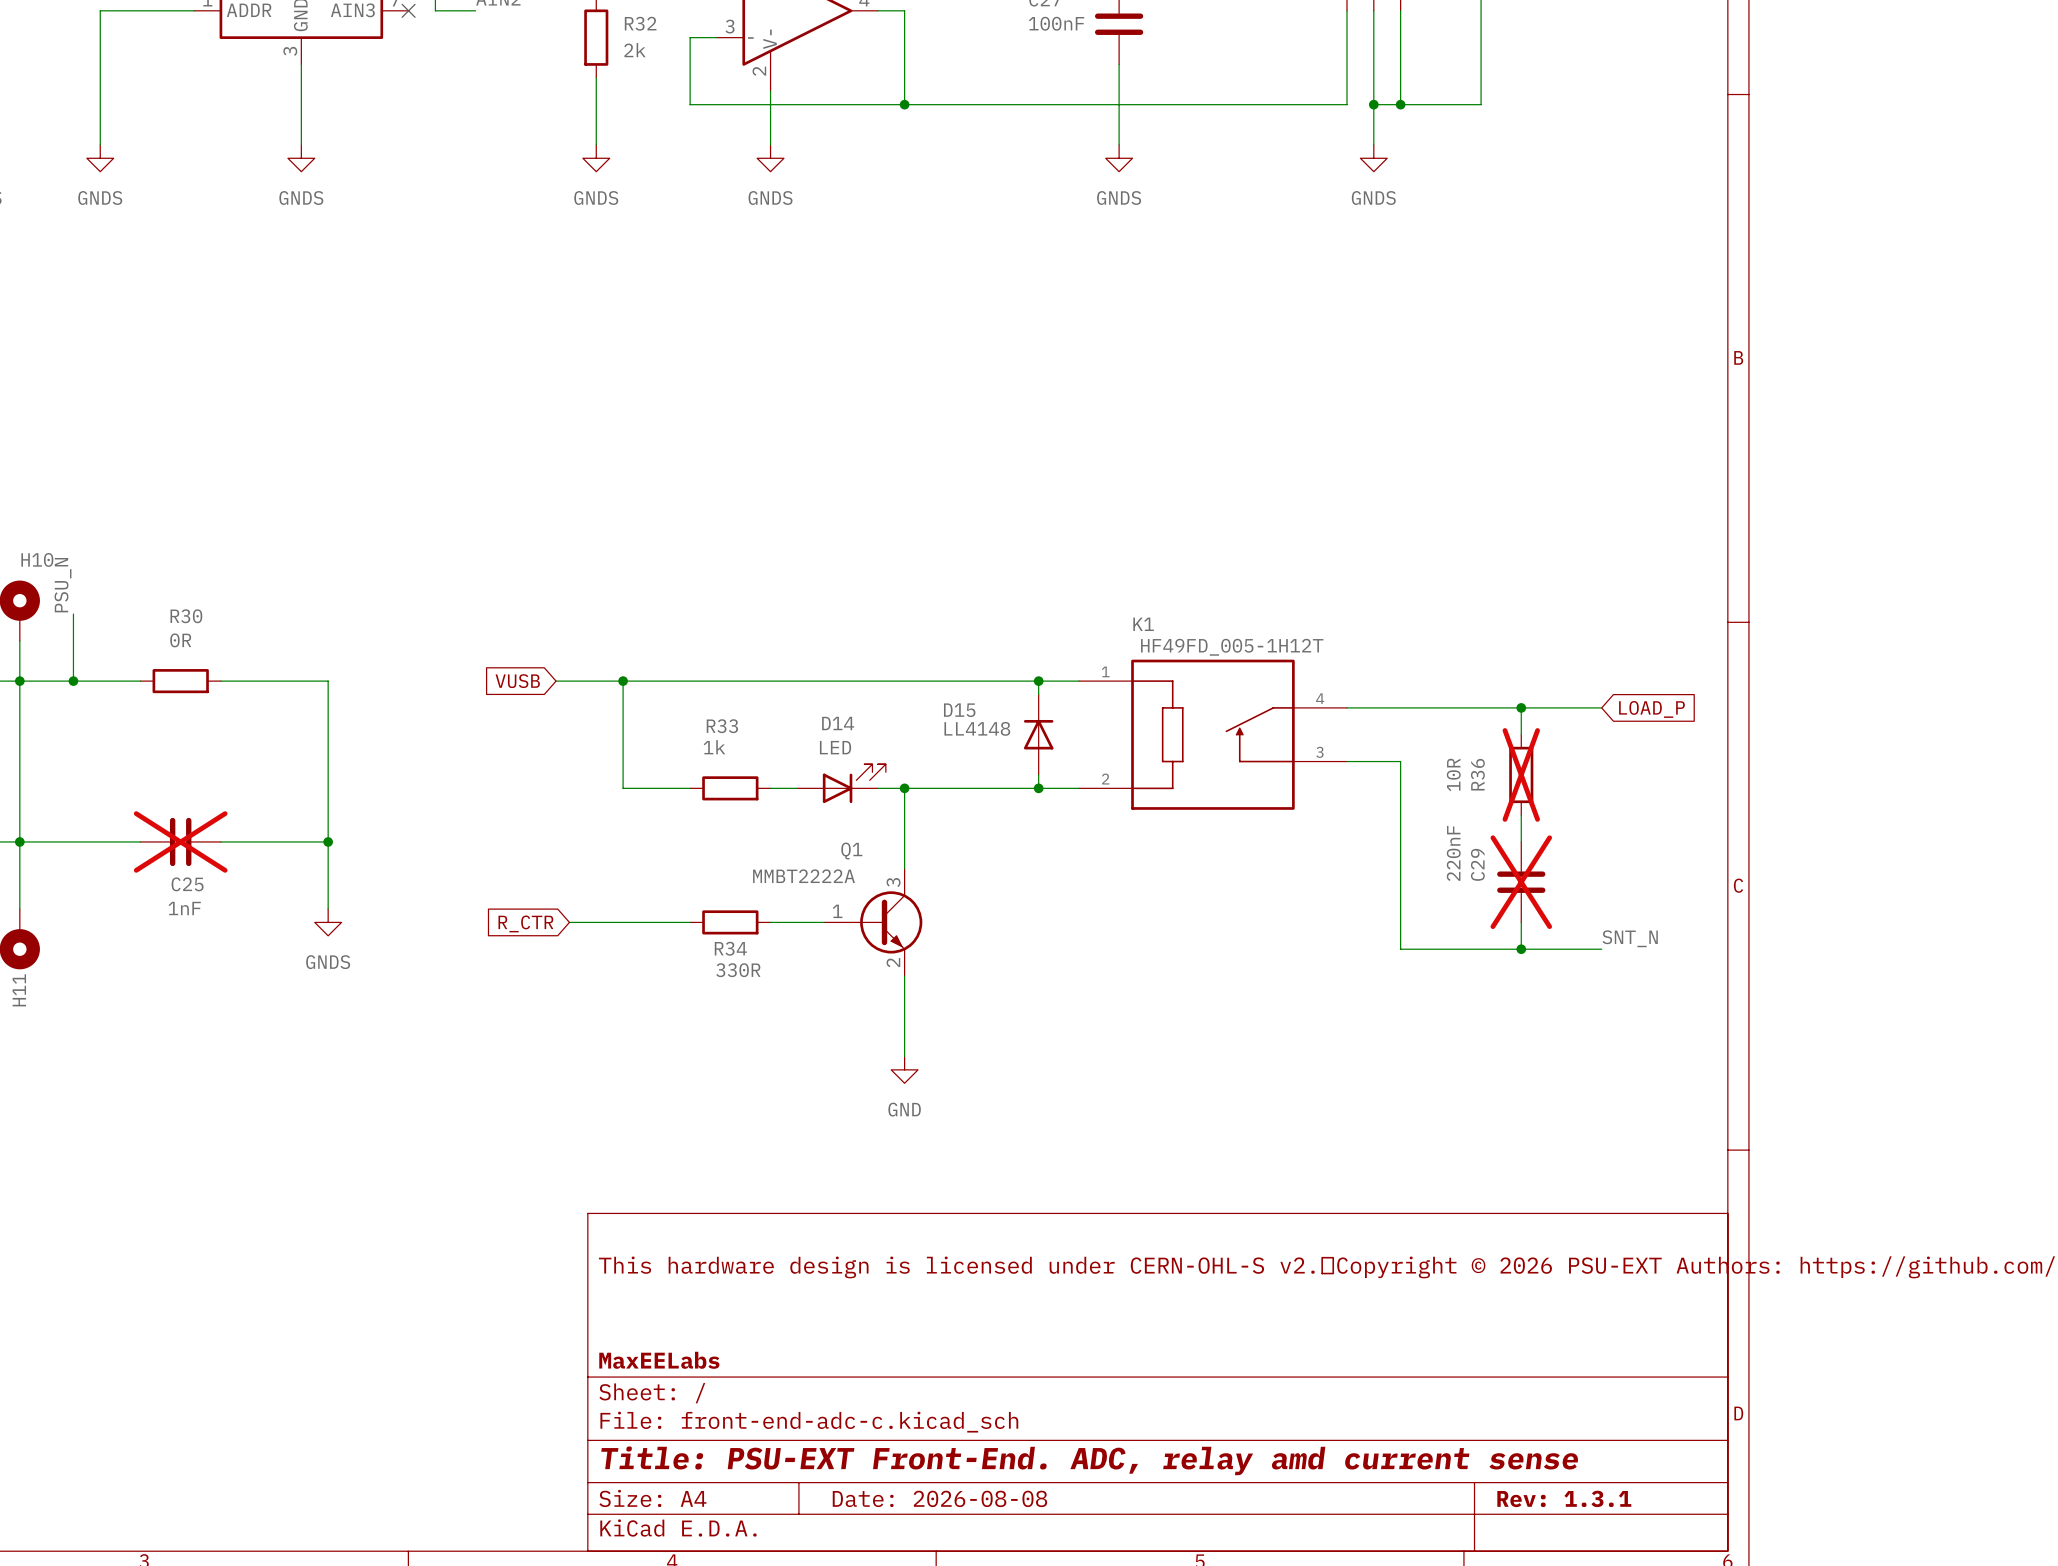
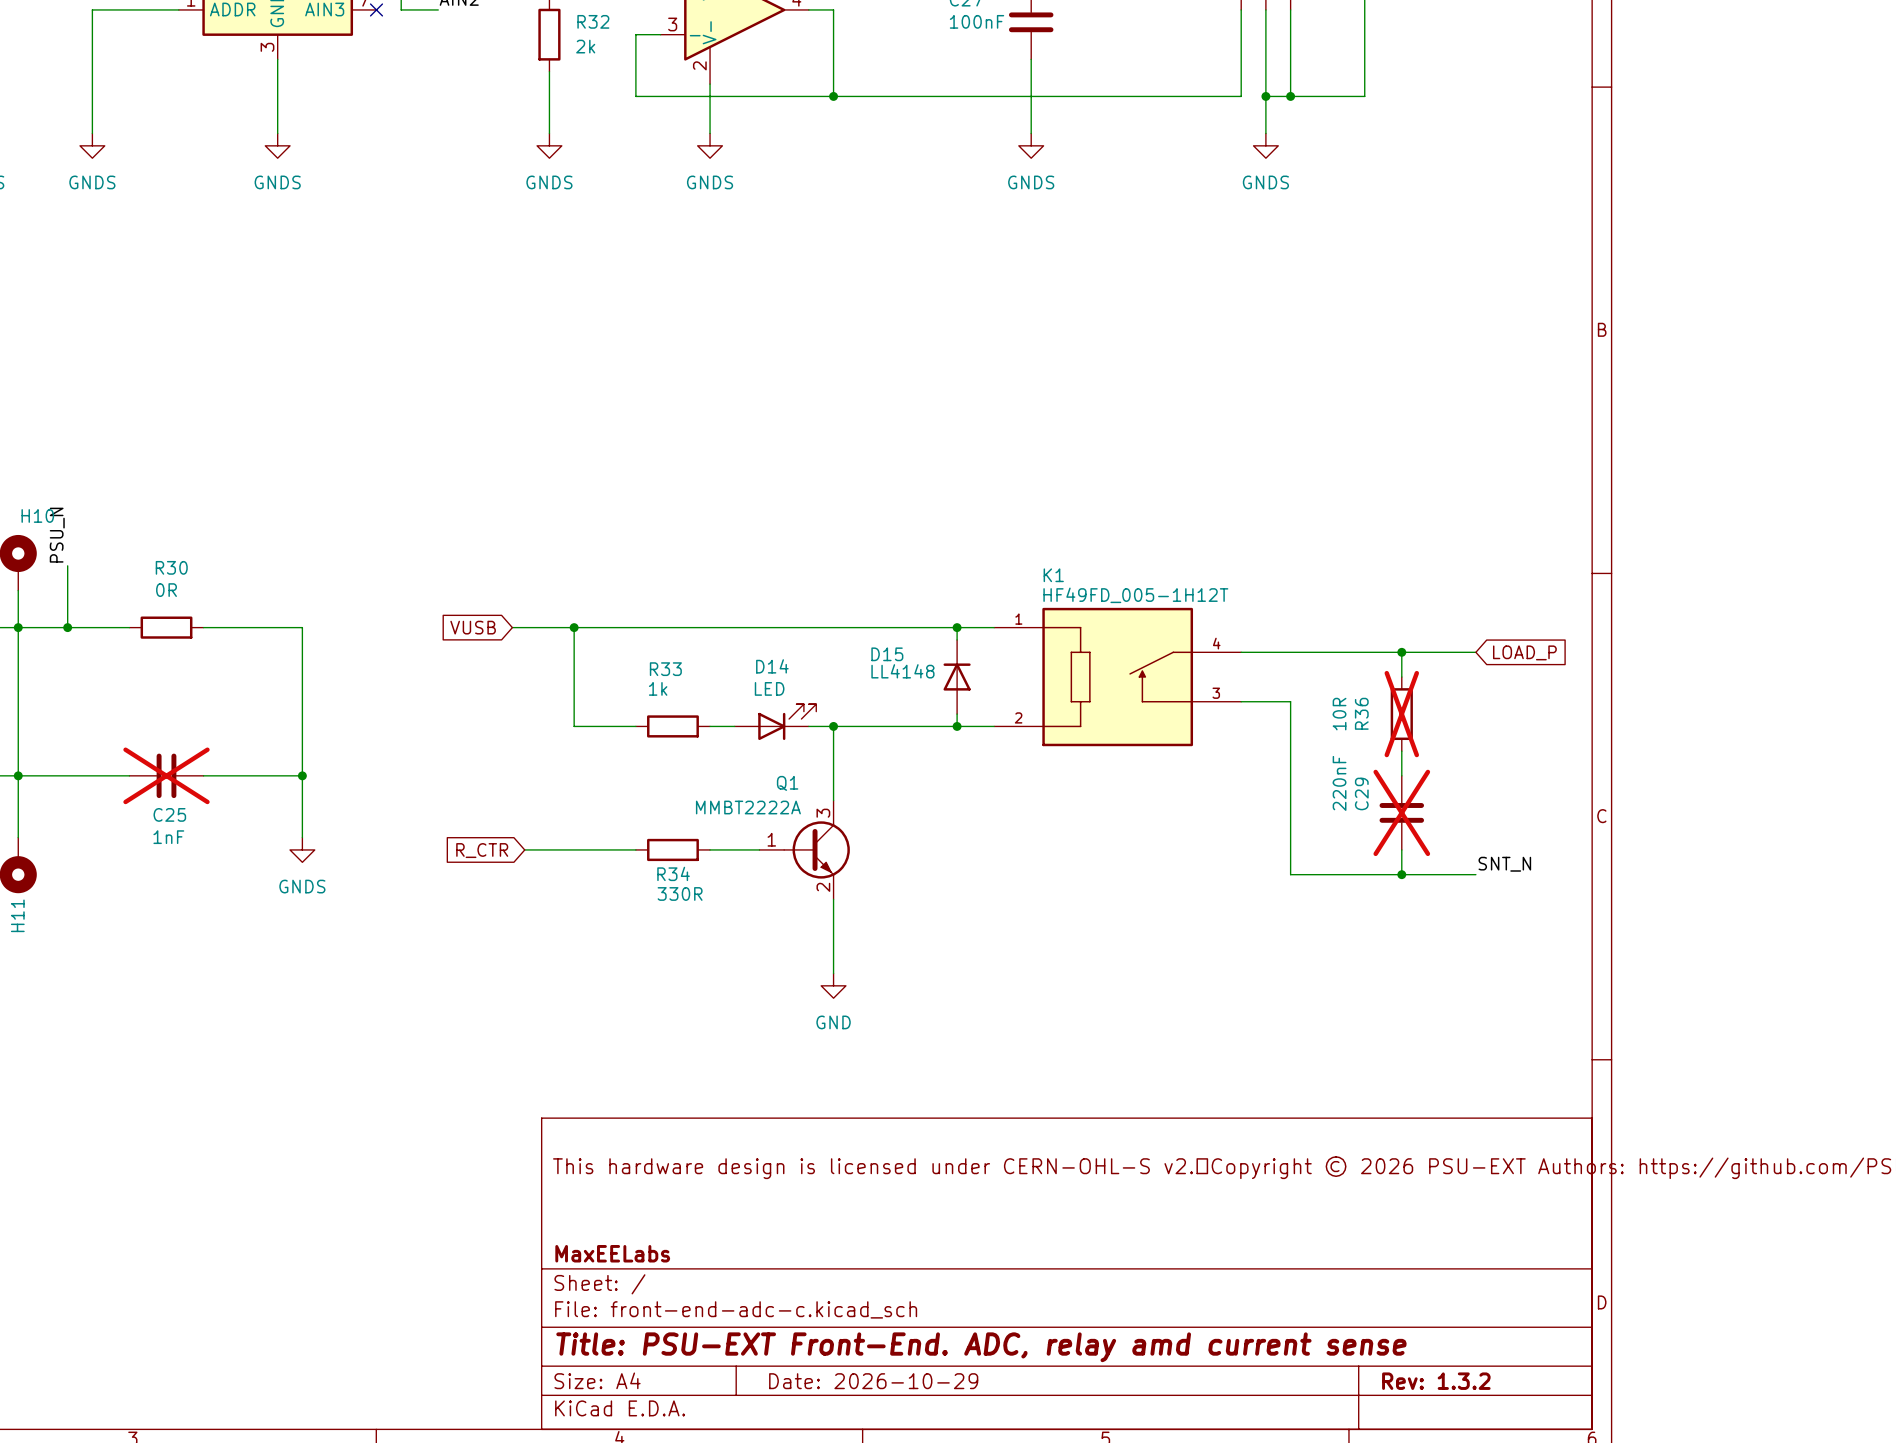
title block: Date: 2026-08-08 (939, 1498) -> Date: 2026-10-29 (873, 1381)
title block: Rev: 1.3.1 (1564, 1498) -> Rev: 1.3.2 (1436, 1381)

